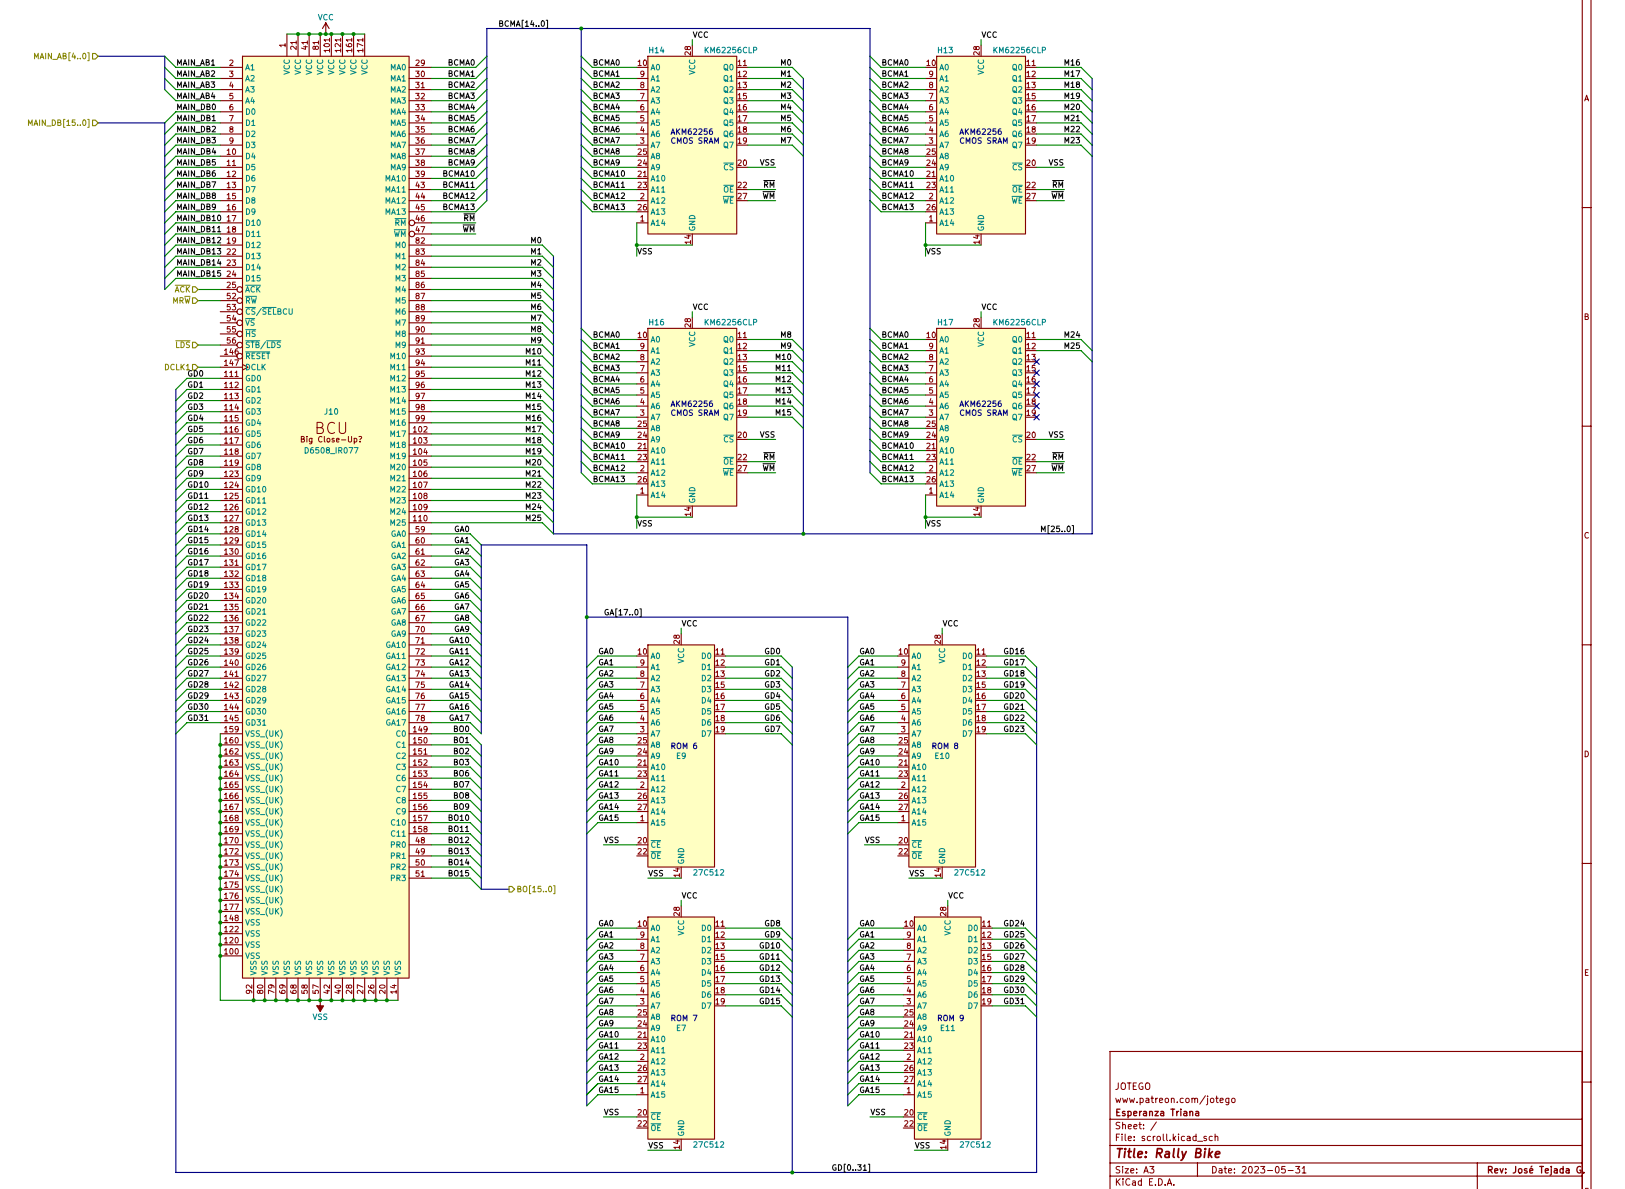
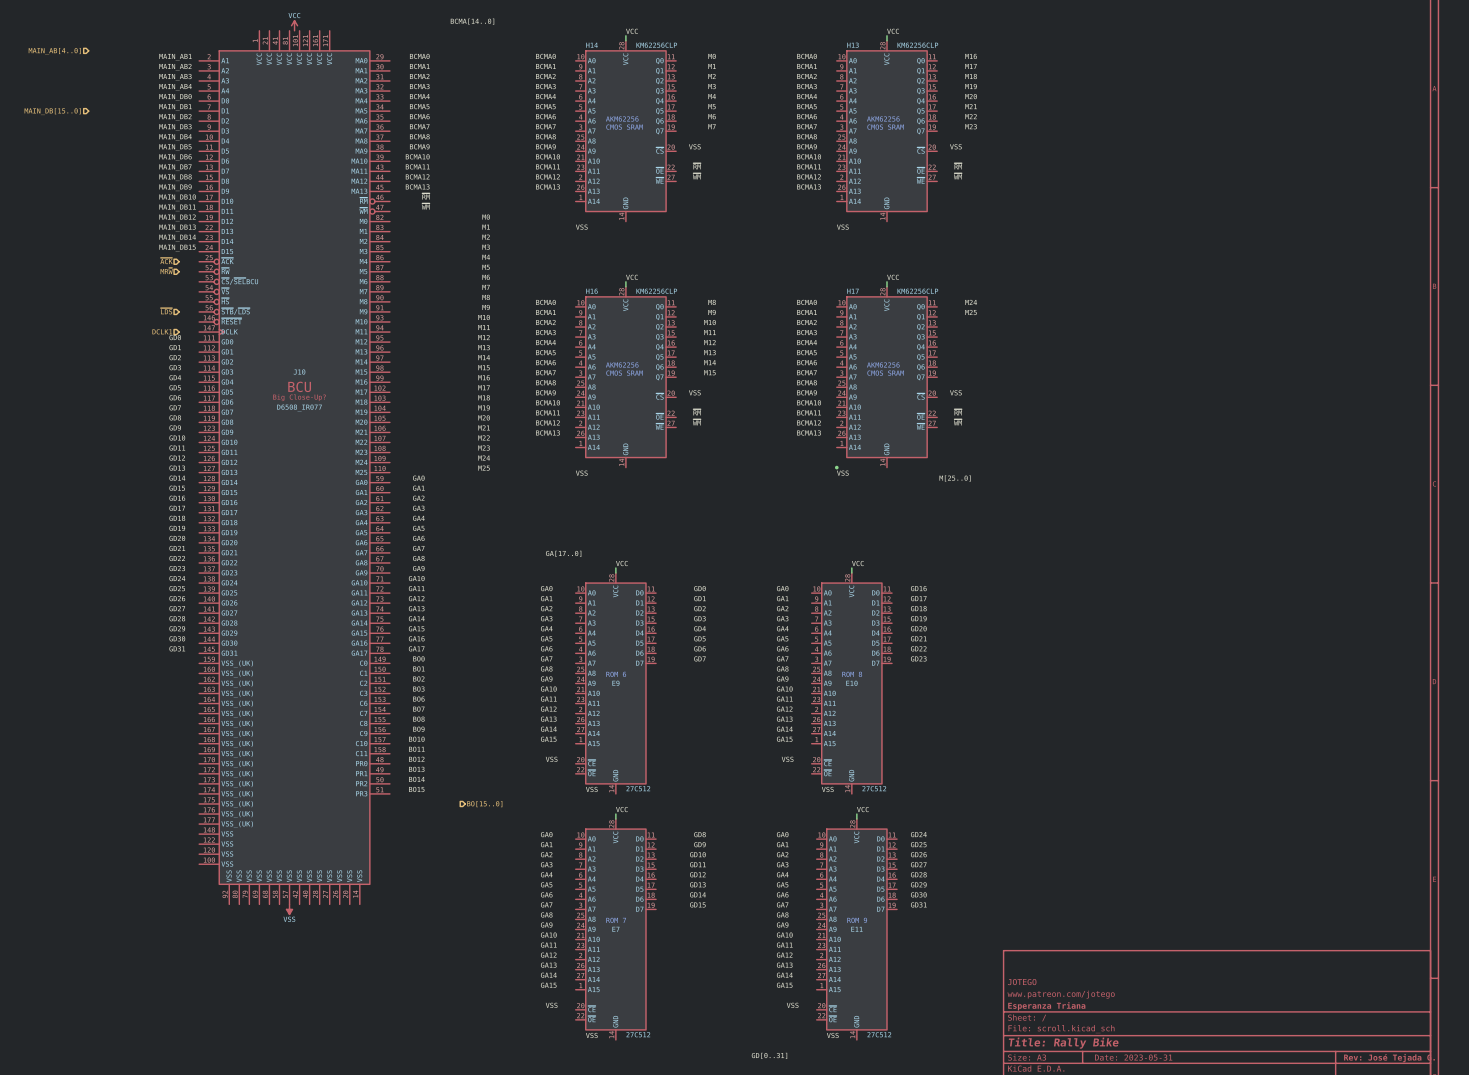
bus: (581, 28) (581, 472) -> none
junction: (581, 28) -> none
wire: (286, 34) (364, 34) -> none
junction: (298, 34) -> none
junction: (309, 34) -> none
junction: (320, 34) -> none
junction: (325, 34) -> none
junction: (331, 34) -> none
junction: (342, 34) -> none
junction: (353, 34) -> none
bus: (98, 56) (164, 56) (164, 89) -> none
wire: (164, 56) (175, 67) (220, 67) -> none
wire: (486, 56) (475, 67) (431, 67) -> none
wire: (581, 56) (592, 67) (636, 67) -> none
wire: (870, 56) (881, 67) (925, 67) -> none
wire: (164, 67) (175, 78) (220, 78) -> none
wire: (486, 67) (475, 78) (431, 78) -> none
wire: (581, 67) (592, 78) (636, 78) -> none
wire: (747, 67) (792, 67) (803, 78) -> none
wire: (870, 67) (881, 78) (925, 78) -> none
wire: (1036, 67) (1081, 67) (1092, 78) -> none
wire: (164, 78) (175, 89) (220, 89) -> none
wire: (486, 78) (475, 89) (431, 89) -> none
wire: (581, 78) (592, 89) (636, 89) -> none
wire: (747, 78) (792, 78) (803, 89) -> none
bus: (803, 78) (803, 533) -> none
wire: (870, 78) (881, 89) (925, 89) -> none
wire: (1036, 78) (1081, 78) (1092, 89) -> none
bus: (1092, 78) (1092, 533) (553, 533) (553, 256) -> none
wire: (164, 89) (175, 100) (220, 100) -> none
wire: (486, 89) (475, 100) (431, 100) -> none
wire: (581, 89) (592, 100) (636, 100) -> none
wire: (747, 89) (792, 89) (803, 100) -> none
wire: (870, 89) (881, 100) (925, 100) -> none
wire: (1036, 89) (1081, 89) (1092, 100) -> none
wire: (486, 100) (475, 111) (431, 111) -> none
wire: (581, 100) (592, 111) (636, 111) -> none
wire: (747, 100) (792, 100) (803, 111) -> none
wire: (870, 100) (881, 111) (925, 111) -> none
wire: (1036, 100) (1081, 100) (1092, 111) -> none
wire: (220, 111) (175, 111) (164, 122) -> none
wire: (486, 111) (475, 122) (431, 122) -> none
wire: (581, 111) (592, 122) (636, 122) -> none
wire: (747, 111) (792, 111) (803, 122) -> none
wire: (870, 111) (881, 122) (925, 122) -> none
wire: (1036, 111) (1081, 111) (1092, 122) -> none
bus: (98, 122) (164, 122) (164, 289) -> none
wire: (220, 122) (175, 122) (164, 134) -> none
wire: (486, 122) (475, 134) (431, 134) -> none
wire: (581, 122) (592, 134) (636, 134) -> none
wire: (747, 122) (792, 122) (803, 134) -> none
wire: (870, 122) (881, 134) (925, 134) -> none
wire: (1036, 122) (1081, 122) (1092, 134) -> none
wire: (220, 134) (175, 134) (164, 145) -> none
wire: (486, 134) (475, 145) (431, 145) -> none
wire: (581, 134) (592, 145) (636, 145) -> none
wire: (747, 134) (792, 134) (803, 145) -> none
wire: (870, 134) (881, 145) (925, 145) -> none
wire: (1036, 134) (1081, 134) (1092, 145) -> none
wire: (220, 145) (175, 145) (164, 156) -> none
wire: (486, 145) (475, 156) (431, 156) -> none
wire: (581, 145) (592, 156) (636, 156) -> none
wire: (747, 145) (792, 145) (803, 156) -> none
wire: (870, 145) (881, 156) (925, 156) -> none
wire: (1036, 145) (1081, 145) (1092, 156) -> none
wire: (220, 156) (175, 156) (164, 167) -> none
wire: (486, 156) (475, 167) (431, 167) -> none
wire: (581, 156) (592, 167) (636, 167) -> none
wire: (870, 156) (881, 167) (925, 167) -> none
wire: (220, 167) (175, 167) (164, 178) -> none
wire: (486, 167) (475, 178) (431, 178) -> none
wire: (581, 167) (592, 178) (636, 178) -> none
wire: (747, 167) (775, 167) -> none
wire: (870, 167) (881, 178) (925, 178) -> none
wire: (1036, 167) (1064, 167) -> none
wire: (220, 178) (175, 178) (164, 189) -> none
wire: (486, 178) (475, 189) (431, 189) -> none
wire: (581, 178) (592, 189) (636, 189) -> none
wire: (870, 178) (881, 189) (925, 189) -> none
wire: (220, 189) (175, 189) (164, 200) -> none
wire: (486, 189) (475, 200) (431, 200) -> none
wire: (581, 189) (592, 200) (636, 200) -> none
wire: (747, 189) (775, 189) -> none
wire: (870, 189) (881, 200) (925, 200) -> none
wire: (1036, 189) (1064, 189) -> none
wire: (220, 200) (175, 200) (164, 211) -> none
wire: (486, 200) (475, 211) (431, 211) -> none
bus: (486, 200) (486, 28) (870, 28) (870, 472) -> none
wire: (581, 200) (592, 211) (636, 211) -> none
wire: (747, 200) (775, 200) -> none
wire: (870, 200) (881, 211) (925, 211) -> none
wire: (1036, 200) (1064, 200) -> none
wire: (220, 211) (175, 211) (164, 222) -> none
wire: (220, 222) (175, 222) (164, 233) -> none
wire: (431, 222) (475, 222) -> none
wire: (636, 222) (636, 256) -> none
wire: (925, 222) (925, 256) -> none
wire: (220, 233) (175, 233) (164, 245) -> none
wire: (431, 233) (475, 233) -> none
wire: (220, 245) (175, 245) (164, 256) -> none
wire: (431, 245) (542, 245) (553, 256) -> none
wire: (636, 245) (692, 245) -> none
junction: (636, 245) -> none
wire: (925, 245) (981, 245) -> none
junction: (925, 245) -> none
wire: (220, 256) (175, 256) (164, 267) -> none
wire: (431, 256) (542, 256) (553, 267) -> none
wire: (220, 267) (175, 267) (164, 278) -> none
wire: (431, 267) (542, 267) (553, 278) -> none
wire: (220, 278) (175, 278) (164, 289) -> none
wire: (431, 278) (542, 278) (553, 289) -> none
wire: (198, 289) (220, 289) -> none
wire: (431, 289) (542, 289) (553, 300) -> none
wire: (198, 300) (220, 300) -> none
wire: (431, 300) (542, 300) (553, 311) -> none
wire: (431, 311) (542, 311) (553, 322) -> none
wire: (431, 322) (542, 322) (553, 333) -> none
wire: (581, 328) (592, 339) (636, 339) -> none
wire: (870, 328) (881, 339) (925, 339) -> none
wire: (431, 333) (542, 333) (553, 345) -> none
wire: (581, 339) (592, 350) (636, 350) -> none
wire: (747, 339) (792, 339) (803, 350) -> none
wire: (870, 339) (881, 350) (925, 350) -> none
wire: (1036, 339) (1081, 339) (1092, 350) -> none
wire: (198, 345) (220, 345) -> none
wire: (431, 345) (542, 345) (553, 356) -> none
wire: (581, 350) (592, 361) (636, 361) -> none
wire: (747, 350) (792, 350) (803, 361) -> none
wire: (870, 350) (881, 361) (925, 361) -> none
wire: (1036, 350) (1081, 350) (1092, 361) -> none
wire: (431, 356) (542, 356) (553, 367) -> none
wire: (581, 361) (592, 372) (636, 372) -> none
wire: (747, 361) (792, 361) (803, 372) -> none
wire: (870, 361) (881, 372) (925, 372) -> none
no-connect mark: (1036, 361) -> none
wire: (198, 367) (220, 367) -> none
wire: (431, 367) (542, 367) (553, 378) -> none
wire: (581, 372) (592, 383) (636, 383) -> none
wire: (747, 372) (792, 372) (803, 383) -> none
wire: (870, 372) (881, 383) (925, 383) -> none
no-connect mark: (1036, 372) -> none
wire: (220, 378) (186, 378) (175, 389) -> none
wire: (431, 378) (542, 378) (553, 389) -> none
wire: (581, 383) (592, 395) (636, 395) -> none
wire: (747, 383) (792, 383) (803, 395) -> none
wire: (870, 383) (881, 395) (925, 395) -> none
no-connect mark: (1036, 383) -> none
bus: (175, 389) (175, 1172) (1036, 1172) (1036, 667) -> none
wire: (220, 389) (186, 389) (175, 400) -> none
wire: (431, 389) (542, 389) (553, 400) -> none
wire: (581, 395) (592, 406) (636, 406) -> none
wire: (747, 395) (792, 395) (803, 406) -> none
wire: (870, 395) (881, 406) (925, 406) -> none
no-connect mark: (1036, 395) -> none
wire: (220, 400) (186, 400) (175, 411) -> none
wire: (431, 400) (542, 400) (553, 411) -> none
wire: (581, 406) (592, 417) (636, 417) -> none
wire: (747, 406) (792, 406) (803, 417) -> none
wire: (870, 406) (881, 417) (925, 417) -> none
no-connect mark: (1036, 406) -> none
wire: (220, 411) (186, 411) (175, 422) -> none
wire: (431, 411) (542, 411) (553, 422) -> none
wire: (581, 417) (592, 428) (636, 428) -> none
wire: (747, 417) (792, 417) (803, 428) -> none
wire: (870, 417) (881, 428) (925, 428) -> none
no-connect mark: (1036, 417) -> none
wire: (220, 422) (186, 422) (175, 433) -> none
wire: (431, 422) (542, 422) (553, 433) -> none
wire: (581, 428) (592, 439) (636, 439) -> none
wire: (870, 428) (881, 439) (925, 439) -> none
wire: (220, 433) (186, 433) (175, 444) -> none
wire: (431, 433) (542, 433) (553, 444) -> none
wire: (581, 439) (592, 450) (636, 450) -> none
wire: (747, 439) (775, 439) -> none
wire: (870, 439) (881, 450) (925, 450) -> none
wire: (1036, 439) (1064, 439) -> none
wire: (220, 444) (186, 444) (175, 456) -> none
wire: (431, 444) (542, 444) (553, 456) -> none
wire: (581, 450) (592, 461) (636, 461) -> none
wire: (870, 450) (881, 461) (925, 461) -> none
wire: (220, 456) (186, 456) (175, 467) -> none
wire: (431, 456) (542, 456) (553, 467) -> none
wire: (581, 461) (592, 472) (636, 472) -> none
wire: (747, 461) (775, 461) -> none
wire: (870, 461) (881, 472) (925, 472) -> none
wire: (1036, 461) (1064, 461) -> none
wire: (220, 467) (186, 467) (175, 478) -> none
wire: (431, 467) (542, 467) (553, 478) -> none
wire: (581, 472) (592, 483) (636, 483) -> none
wire: (747, 472) (775, 472) -> none
wire: (870, 472) (881, 483) (925, 483) -> none
wire: (1036, 472) (1064, 472) -> none
wire: (220, 478) (186, 478) (175, 489) -> none
wire: (431, 478) (542, 478) (553, 489) -> none
wire: (220, 489) (186, 489) (175, 500) -> none
wire: (431, 489) (542, 489) (553, 500) -> none
wire: (636, 494) (636, 528) -> none
wire: (925, 494) (925, 528) -> none
wire: (220, 500) (186, 500) (175, 511) -> none
wire: (431, 500) (542, 500) (553, 511) -> none
wire: (220, 511) (186, 511) (175, 522) -> none
wire: (431, 511) (542, 511) (553, 522) -> none
wire: (636, 517) (692, 517) -> none
junction: (636, 517) -> none
wire: (925, 517) (981, 517) -> none
wire: (220, 522) (186, 522) (175, 533) -> none
wire: (431, 522) (542, 522) (553, 533) -> none
wire: (220, 533) (186, 533) (175, 544) -> none
wire: (431, 533) (470, 533) (481, 544) -> none
junction: (803, 533) -> none
wire: (220, 544) (186, 544) (175, 556) -> none
wire: (431, 544) (470, 544) (481, 556) -> none
wire: (220, 556) (186, 556) (175, 567) -> none
wire: (431, 556) (470, 556) (481, 567) -> none
wire: (220, 567) (186, 567) (175, 578) -> none
wire: (431, 567) (470, 567) (481, 578) -> none
wire: (220, 578) (186, 578) (175, 589) -> none
wire: (431, 578) (470, 578) (481, 589) -> none
wire: (220, 589) (186, 589) (175, 600) -> none
wire: (431, 589) (470, 589) (481, 600) -> none
wire: (220, 600) (186, 600) (175, 611) -> none
wire: (431, 600) (470, 600) (481, 611) -> none
wire: (220, 611) (186, 611) (175, 622) -> none
wire: (431, 611) (470, 611) (481, 622) -> none
bus: (586, 617) (847, 617) (847, 1105) -> none
junction: (586, 617) -> none
wire: (220, 622) (186, 622) (175, 633) -> none
wire: (431, 622) (470, 622) (481, 633) -> none
wire: (220, 633) (186, 633) (175, 644) -> none
wire: (431, 633) (470, 633) (481, 644) -> none
wire: (220, 644) (186, 644) (175, 656) -> none
wire: (431, 644) (470, 644) (481, 656) -> none
wire: (220, 656) (186, 656) (175, 667) -> none
wire: (431, 656) (470, 656) (481, 667) -> none
wire: (636, 656) (597, 656) (586, 667) -> none
wire: (725, 656) (781, 656) (792, 667) -> none
wire: (897, 656) (858, 656) (847, 667) -> none
wire: (986, 656) (1025, 656) (1036, 667) -> none
wire: (220, 667) (186, 667) (175, 678) -> none
wire: (431, 667) (470, 667) (481, 678) -> none
wire: (636, 667) (597, 667) (586, 678) -> none
wire: (725, 667) (781, 667) (792, 678) -> none
bus: (792, 667) (792, 1172) -> none
wire: (897, 667) (858, 667) (847, 678) -> none
wire: (986, 667) (1025, 667) (1036, 678) -> none
wire: (220, 678) (186, 678) (175, 689) -> none
wire: (431, 678) (470, 678) (481, 689) -> none
wire: (636, 678) (597, 678) (586, 689) -> none
wire: (725, 678) (781, 678) (792, 689) -> none
wire: (897, 678) (858, 678) (847, 689) -> none
wire: (986, 678) (1025, 678) (1036, 689) -> none
wire: (220, 689) (186, 689) (175, 700) -> none
wire: (431, 689) (470, 689) (481, 700) -> none
wire: (636, 689) (597, 689) (586, 700) -> none
wire: (725, 689) (781, 689) (792, 700) -> none
wire: (897, 689) (858, 689) (847, 700) -> none
wire: (986, 689) (1025, 689) (1036, 700) -> none
wire: (220, 700) (186, 700) (175, 711) -> none
wire: (431, 700) (470, 700) (481, 711) -> none
wire: (636, 700) (597, 700) (586, 711) -> none
wire: (725, 700) (781, 700) (792, 711) -> none
wire: (897, 700) (858, 700) (847, 711) -> none
wire: (986, 700) (1025, 700) (1036, 711) -> none
wire: (220, 711) (186, 711) (175, 722) -> none
wire: (431, 711) (470, 711) (481, 722) -> none
wire: (636, 711) (597, 711) (586, 722) -> none
wire: (725, 711) (781, 711) (792, 722) -> none
wire: (897, 711) (858, 711) (847, 722) -> none
wire: (986, 711) (1025, 711) (1036, 722) -> none
wire: (220, 722) (186, 722) (175, 733) -> none
wire: (431, 722) (470, 722) (481, 733) -> none
wire: (636, 722) (597, 722) (586, 733) -> none
wire: (725, 722) (781, 722) (792, 733) -> none
wire: (897, 722) (858, 722) (847, 733) -> none
wire: (986, 722) (1025, 722) (1036, 733) -> none
wire: (220, 733) (220, 1000) (397, 1000) -> none
wire: (431, 733) (470, 733) (481, 744) -> none
bus: (481, 733) (481, 544) (586, 544) (586, 1105) -> none
wire: (636, 733) (597, 733) (586, 744) -> none
wire: (725, 733) (781, 733) (792, 744) -> none
wire: (897, 733) (858, 733) (847, 744) -> none
wire: (986, 733) (1025, 733) (1036, 744) -> none
junction: (220, 744) -> none
wire: (431, 744) (470, 744) (481, 755) -> none
bus: (481, 744) (481, 889) (509, 889) -> none
wire: (636, 744) (597, 744) (586, 755) -> none
wire: (897, 744) (858, 744) (847, 755) -> none
junction: (220, 755) -> none
wire: (431, 755) (470, 755) (481, 767) -> none
wire: (636, 755) (597, 755) (586, 767) -> none
wire: (897, 755) (858, 755) (847, 767) -> none
junction: (220, 767) -> none
wire: (431, 767) (470, 767) (481, 778) -> none
wire: (636, 767) (597, 767) (586, 778) -> none
wire: (897, 767) (858, 767) (847, 778) -> none
junction: (220, 778) -> none
wire: (431, 778) (470, 778) (481, 789) -> none
wire: (636, 778) (597, 778) (586, 789) -> none
wire: (897, 778) (858, 778) (847, 789) -> none
junction: (220, 789) -> none
wire: (431, 789) (470, 789) (481, 800) -> none
wire: (636, 789) (597, 789) (586, 800) -> none
wire: (897, 789) (858, 789) (847, 800) -> none
junction: (220, 800) -> none
wire: (431, 800) (470, 800) (481, 811) -> none
wire: (636, 800) (597, 800) (586, 811) -> none
wire: (897, 800) (858, 800) (847, 811) -> none
junction: (220, 811) -> none
wire: (431, 811) (470, 811) (481, 822) -> none
wire: (636, 811) (597, 811) (586, 822) -> none
wire: (897, 811) (858, 811) (847, 822) -> none
junction: (220, 822) -> none
wire: (431, 822) (470, 822) (481, 833) -> none
wire: (636, 822) (597, 822) (586, 833) -> none
wire: (897, 822) (858, 822) (847, 833) -> none
junction: (220, 833) -> none
wire: (431, 833) (470, 833) (481, 844) -> none
junction: (220, 844) -> none
wire: (431, 844) (470, 844) (481, 855) -> none
wire: (603, 844) (636, 844) -> none
wire: (864, 844) (897, 844) -> none
junction: (220, 855) -> none
wire: (431, 855) (470, 855) (481, 867) -> none
junction: (220, 867) -> none
wire: (431, 867) (470, 867) (481, 878) -> none
junction: (220, 878) -> none
wire: (431, 878) (470, 878) (481, 889) -> none
wire: (647, 878) (681, 878) -> none
wire: (908, 878) (942, 878) -> none
junction: (220, 889) -> none
junction: (220, 900) -> none
junction: (220, 911) -> none
junction: (220, 922) -> none
wire: (636, 928) (597, 928) (586, 939) -> none
wire: (725, 928) (781, 928) (792, 939) -> none
wire: (903, 928) (858, 928) (847, 939) -> none
wire: (992, 928) (1025, 928) (1036, 939) -> none
junction: (220, 933) -> none
wire: (636, 939) (597, 939) (586, 950) -> none
wire: (725, 939) (781, 939) (792, 950) -> none
wire: (903, 939) (858, 939) (847, 950) -> none
wire: (992, 939) (1025, 939) (1036, 950) -> none
junction: (220, 944) -> none
wire: (636, 950) (597, 950) (586, 961) -> none
wire: (725, 950) (781, 950) (792, 961) -> none
wire: (903, 950) (858, 950) (847, 961) -> none
wire: (992, 950) (1025, 950) (1036, 961) -> none
junction: (220, 955) -> none
wire: (636, 961) (597, 961) (586, 972) -> none
wire: (725, 961) (781, 961) (792, 972) -> none
wire: (903, 961) (858, 961) (847, 972) -> none
wire: (992, 961) (1025, 961) (1036, 972) -> none
wire: (636, 972) (597, 972) (586, 983) -> none
wire: (725, 972) (781, 972) (792, 983) -> none
wire: (903, 972) (858, 972) (847, 983) -> none
wire: (992, 972) (1025, 972) (1036, 983) -> none
wire: (636, 983) (597, 983) (586, 994) -> none
wire: (725, 983) (781, 983) (792, 994) -> none
wire: (903, 983) (858, 983) (847, 994) -> none
wire: (992, 983) (1025, 983) (1036, 994) -> none
wire: (636, 994) (597, 994) (586, 1005) -> none
wire: (725, 994) (781, 994) (792, 1005) -> none
wire: (903, 994) (858, 994) (847, 1005) -> none
wire: (992, 994) (1025, 994) (1036, 1005) -> none
junction: (253, 1000) -> none
junction: (264, 1000) -> none
junction: (275, 1000) -> none
junction: (286, 1000) -> none
junction: (298, 1000) -> none
junction: (309, 1000) -> none
junction: (320, 1000) -> none
junction: (331, 1000) -> none
junction: (342, 1000) -> none
junction: (353, 1000) -> none
junction: (364, 1000) -> none
junction: (375, 1000) -> none
junction: (386, 1000) -> none
wire: (636, 1005) (597, 1005) (586, 1016) -> none
wire: (725, 1005) (781, 1005) (792, 1016) -> none
wire: (903, 1005) (858, 1005) (847, 1016) -> none
wire: (992, 1005) (1025, 1005) (1036, 1016) -> none
wire: (636, 1016) (597, 1016) (586, 1028) -> none
wire: (903, 1016) (858, 1016) (847, 1028) -> none
wire: (636, 1028) (597, 1028) (586, 1039) -> none
wire: (903, 1028) (858, 1028) (847, 1039) -> none
wire: (636, 1039) (597, 1039) (586, 1050) -> none
wire: (903, 1039) (858, 1039) (847, 1050) -> none
wire: (636, 1050) (597, 1050) (586, 1061) -> none
wire: (903, 1050) (858, 1050) (847, 1061) -> none
wire: (636, 1061) (597, 1061) (586, 1072) -> none
wire: (903, 1061) (858, 1061) (847, 1072) -> none
wire: (636, 1072) (597, 1072) (586, 1083) -> none
wire: (903, 1072) (858, 1072) (847, 1083) -> none
wire: (636, 1083) (597, 1083) (586, 1094) -> none
wire: (903, 1083) (858, 1083) (847, 1094) -> none
wire: (636, 1094) (597, 1094) (586, 1105) -> none
wire: (903, 1094) (858, 1094) (847, 1105) -> none
wire: (603, 1116) (636, 1116) -> none
wire: (870, 1116) (903, 1116) -> none
wire: (647, 1150) (681, 1150) -> none
wire: (914, 1150) (947, 1150) -> none
junction: (792, 1172) -> none

